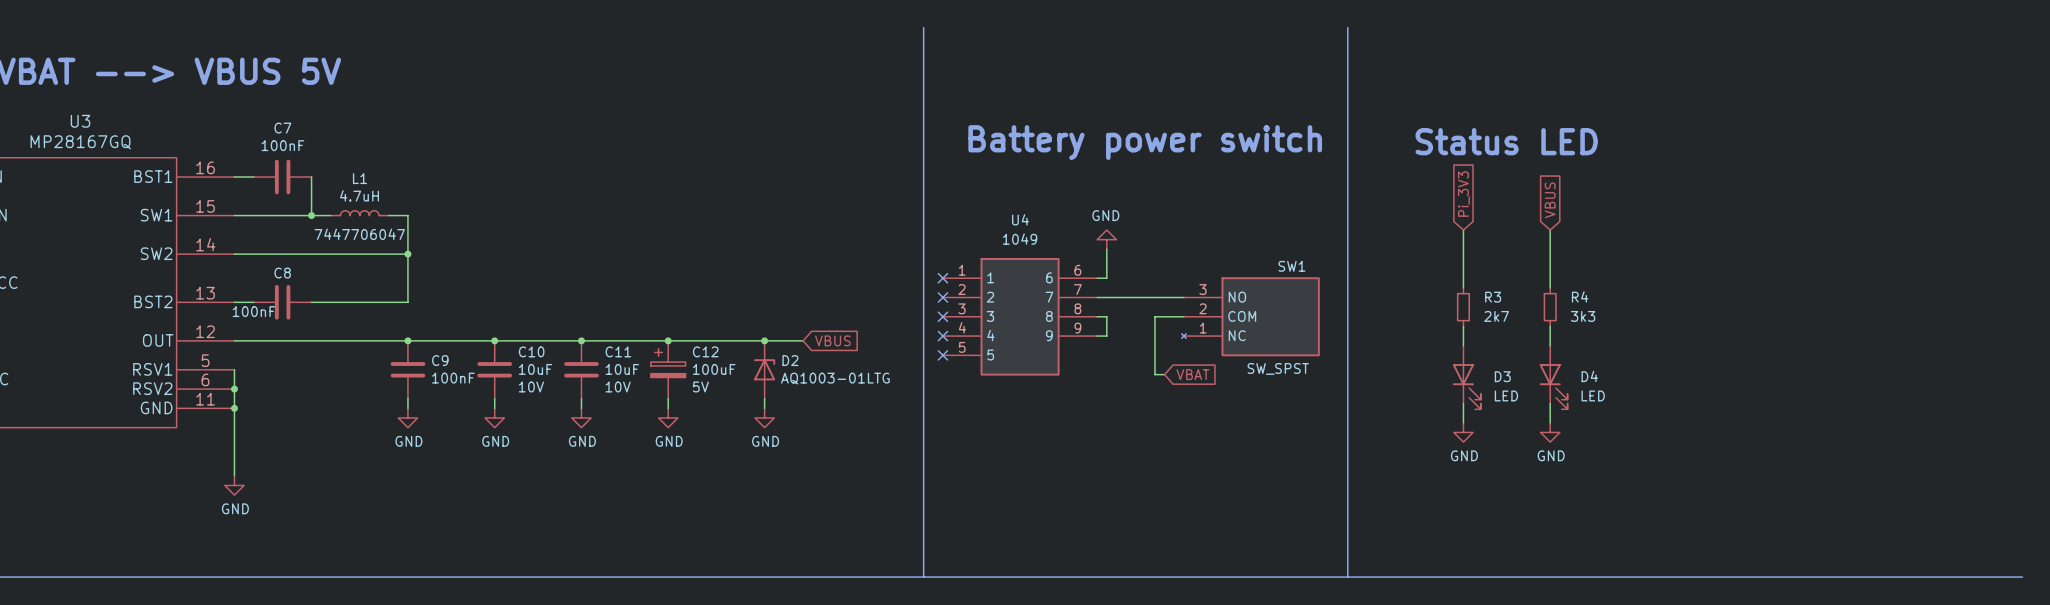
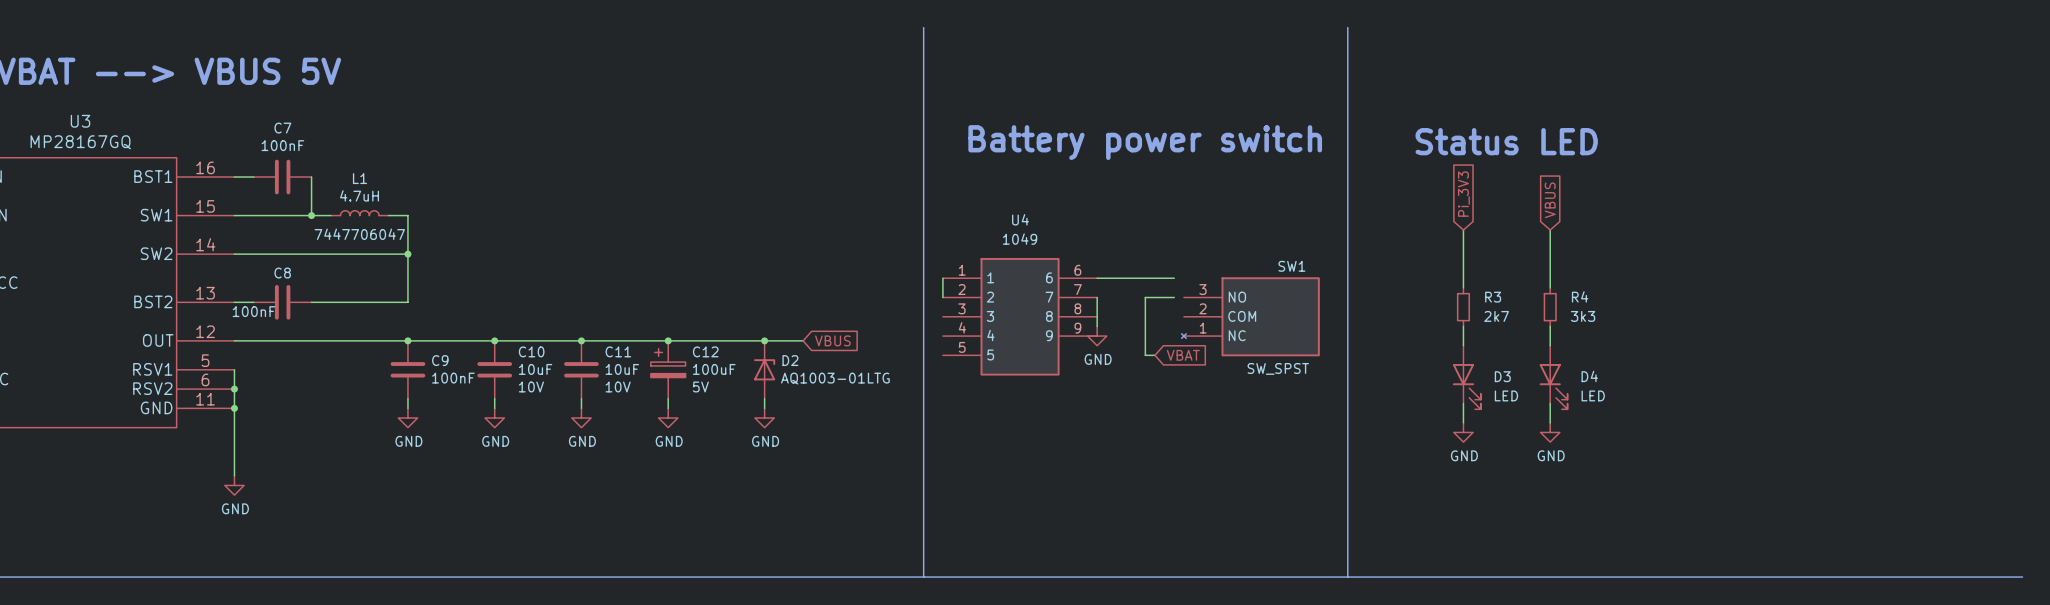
power symbol rotation: 0° (1106, 239) -> 180° (1097, 336)
power symbol position: GND (1106, 239) -> GND (1097, 336)
wire: (1106, 249) (1106, 278) -> (1174, 278) (1106, 278)
wire: none -> (942, 278) (942, 297)
no-connect mark: (942, 278) -> none
no-connect mark: (942, 297) -> none
wire: (1097, 297) (1145, 297) -> (1097, 297) (1097, 326)
wire: none -> (1145, 297) (1145, 355) (1155, 355)
wire: (1174, 297) (1183, 297) -> none
no-connect mark: (942, 316) -> none
wire: (1097, 316) (1106, 316) (1106, 336) (1097, 336) -> none
wire: (1183, 316) (1155, 316) (1155, 374) (1164, 374) -> none
no-connect mark: (942, 336) -> none
no-connect mark: (942, 355) -> none
global label position: VBAT (1192, 374) -> VBAT (1183, 355)

